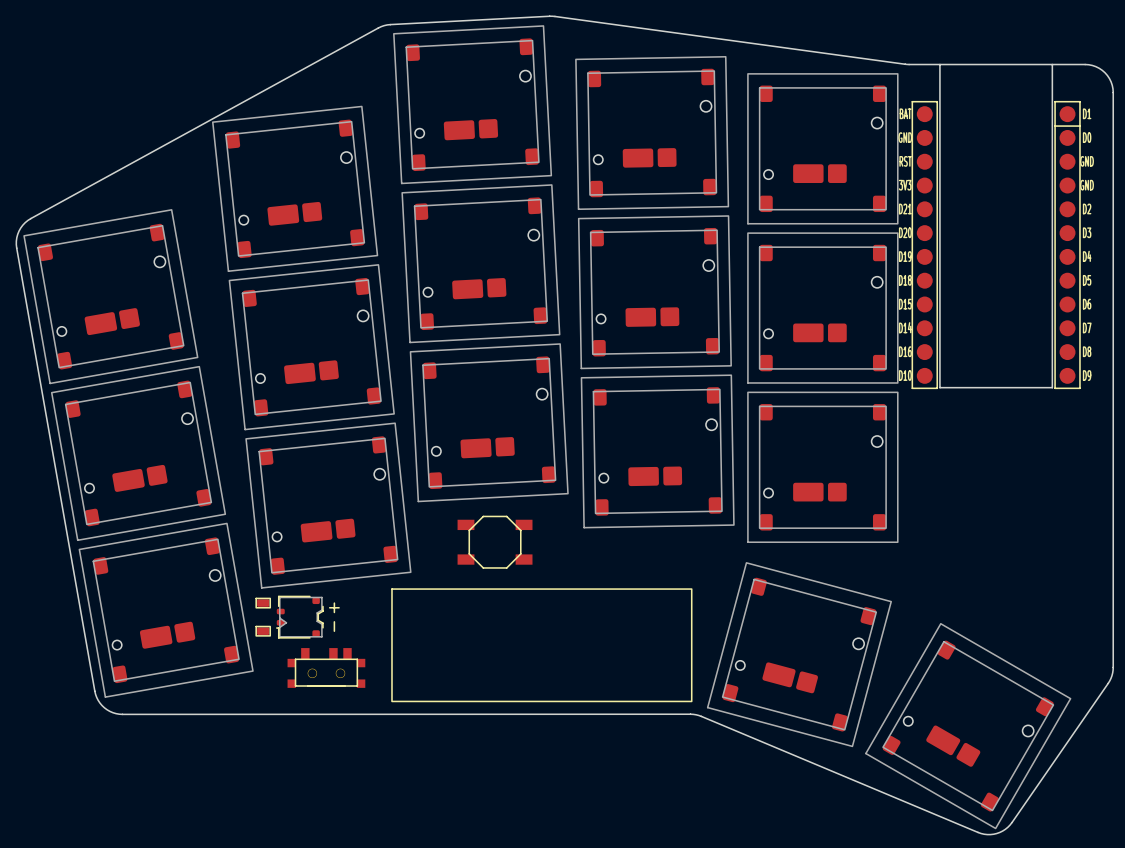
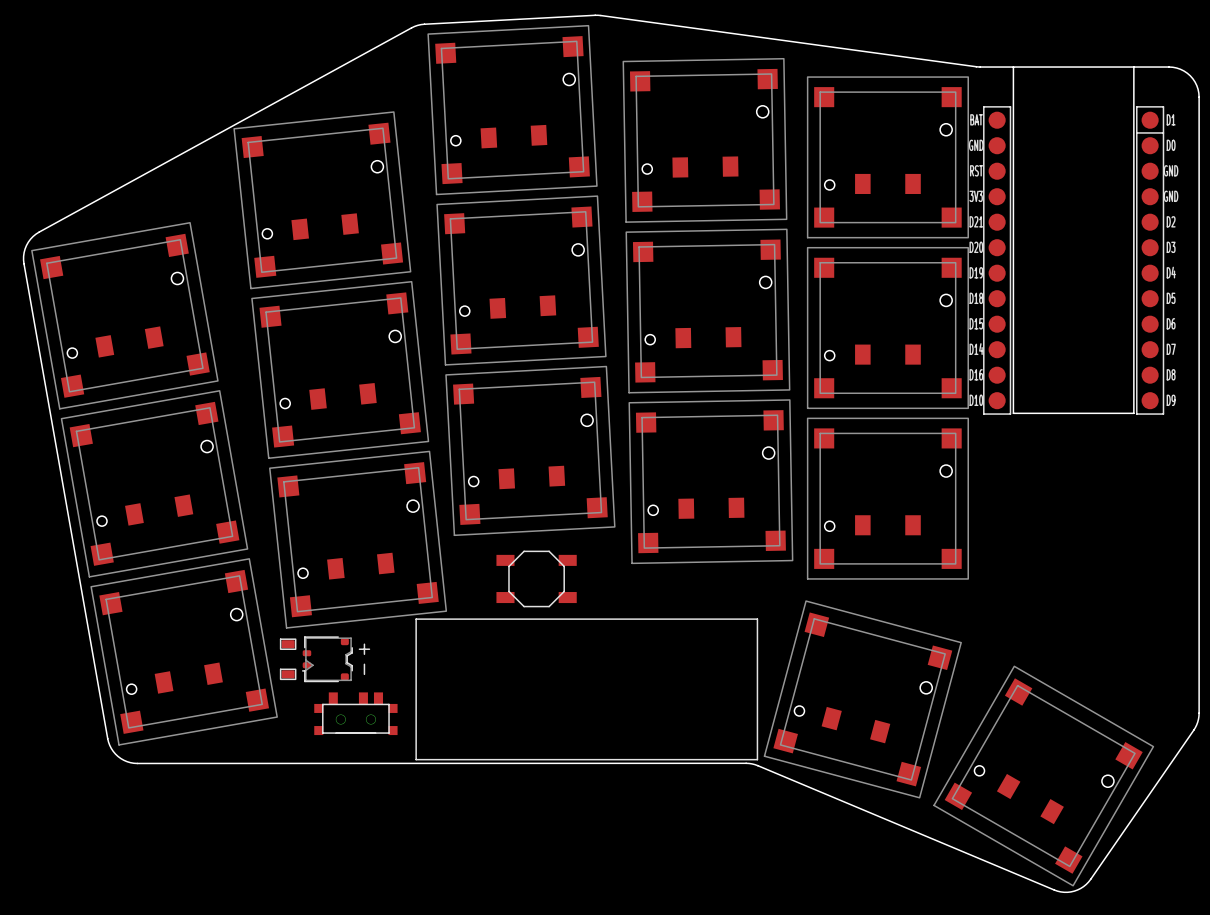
part footprint: [393, 25, 552, 184] -> [427, 25, 598, 195]
part footprint: [575, 56, 729, 210] -> [622, 58, 788, 223]
part footprint: [747, 73, 899, 225] -> [807, 76, 969, 239]
part footprint: [212, 106, 378, 272] -> [233, 111, 412, 290]
part footprint: [401, 184, 561, 343] -> [436, 195, 607, 366]
part footprint: [23, 209, 199, 384] -> [31, 222, 219, 410]
part footprint: [578, 215, 732, 369] -> [625, 228, 791, 394]
part footprint: [747, 232, 899, 384] -> [807, 247, 969, 409]
part footprint: [228, 264, 395, 431] -> [251, 281, 429, 459]
part footprint: [410, 343, 569, 502] -> [445, 366, 616, 536]
part footprint: [51, 366, 226, 541] -> [61, 390, 249, 578]
part footprint: [581, 374, 735, 529] -> [628, 399, 794, 564]
part footprint: [747, 391, 899, 543] -> [807, 417, 969, 580]
part footprint: [245, 422, 412, 589] -> [269, 450, 447, 629]
part footprint: [78, 522, 254, 698] -> [90, 558, 278, 746]
part footprint: [707, 562, 892, 747] -> [763, 600, 962, 799]
drawing shape: [391, 588, 693, 702] -> [415, 618, 758, 761]
part footprint: [865, 623, 1072, 829] -> [933, 665, 1154, 887]

